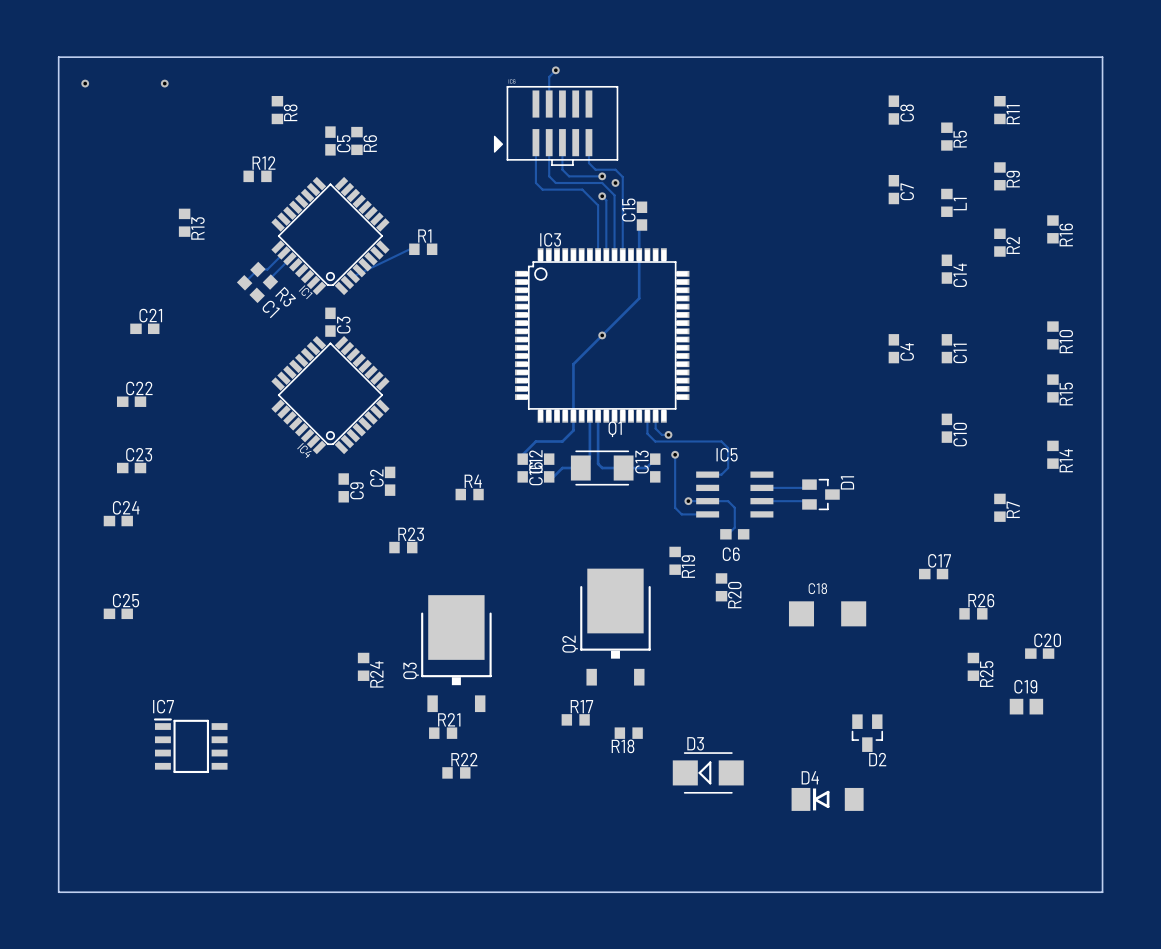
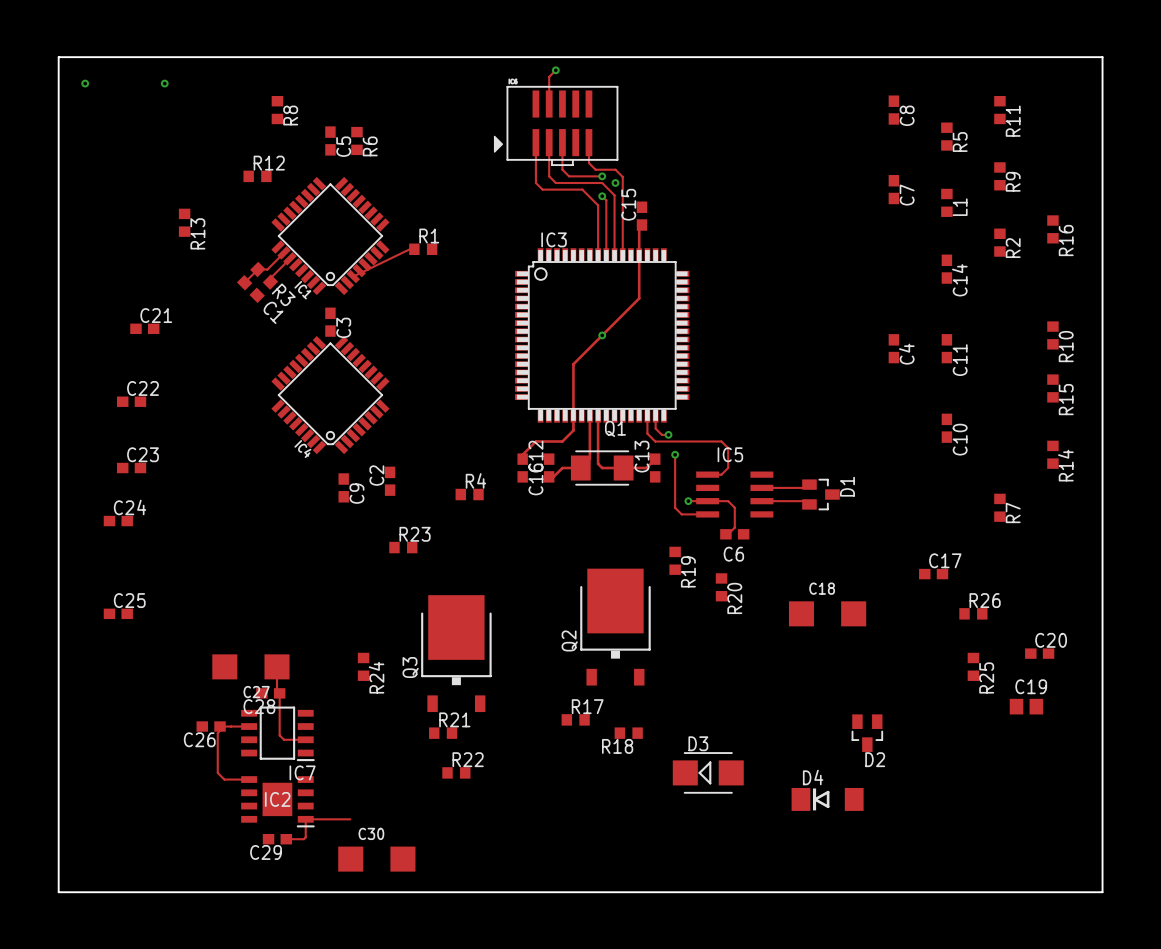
C27: none -> (250, 666)
track: none -> (277, 666) (277, 690) (279, 693) (279, 735) (284, 739) (305, 739)
C28: none -> (270, 693)
C26: none -> (211, 726)
track: none -> (249, 726) (220, 726) (217, 733) (217, 772) (224, 779) (249, 779)
IC7 rotation: 0° (190, 745) -> 180° (277, 733)
IC7 position: (190, 745) -> (277, 733)
IC2: none -> (277, 801)
track: none -> (350, 819) (305, 819) (305, 837) (303, 839) (286, 839)
C29: none -> (277, 839)
C30: none -> (376, 859)

